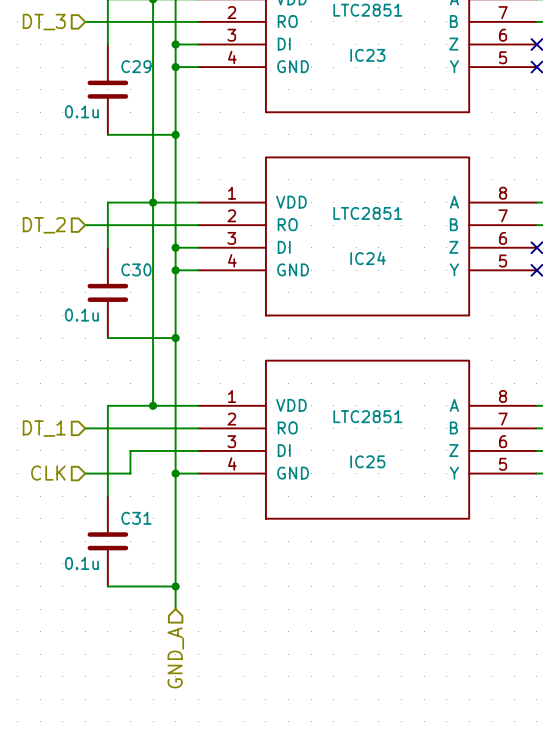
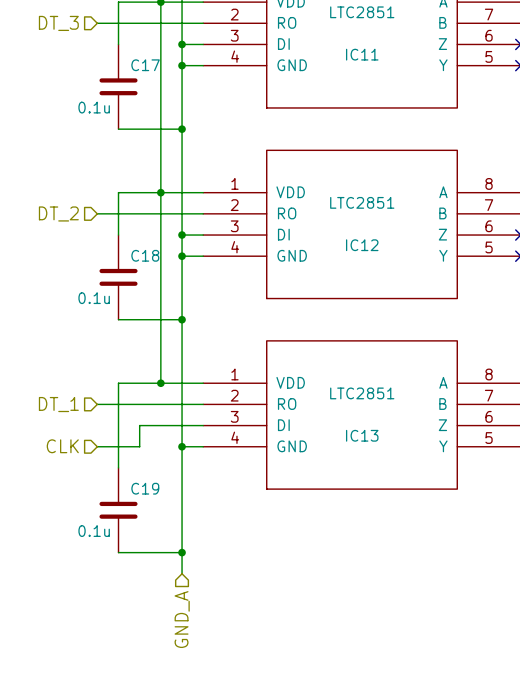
IC23 name: IC23 (367, 55) -> IC11 (362, 54)
C29 name: C29 (136, 66) -> C17 (145, 65)
IC24 name: IC24 (368, 258) -> IC12 (362, 245)
C30 name: C30 (136, 269) -> C18 (145, 255)
IC25 name: IC25 (367, 461) -> IC13 (362, 435)
C31 name: C31 (136, 518) -> C19 (145, 488)

